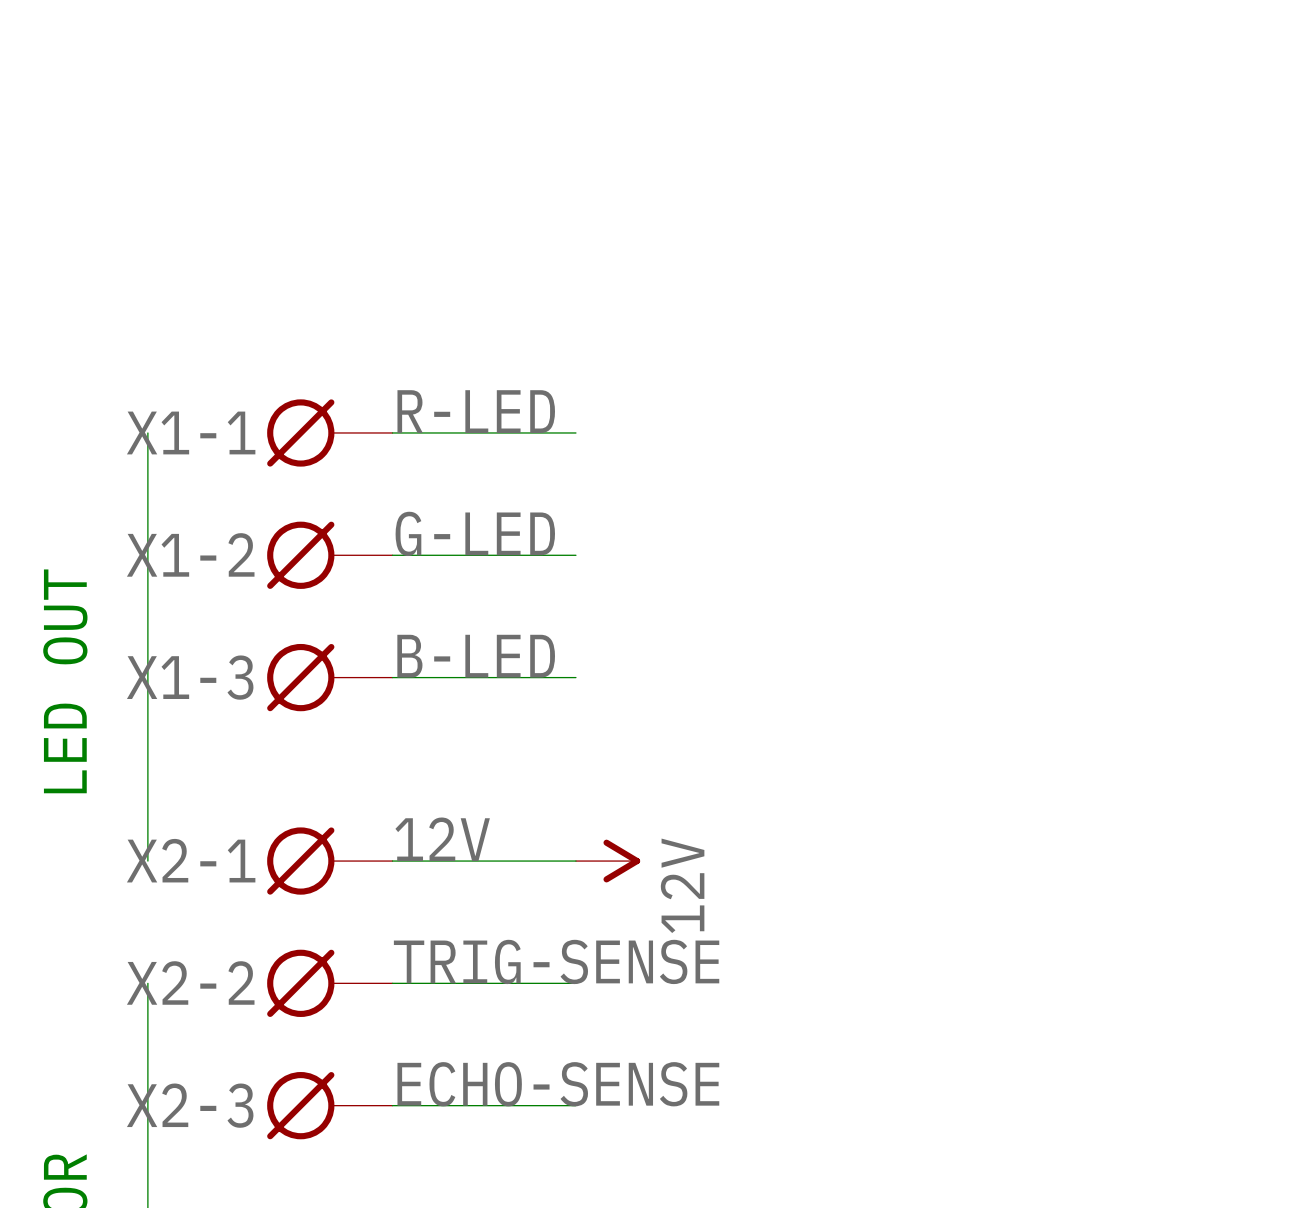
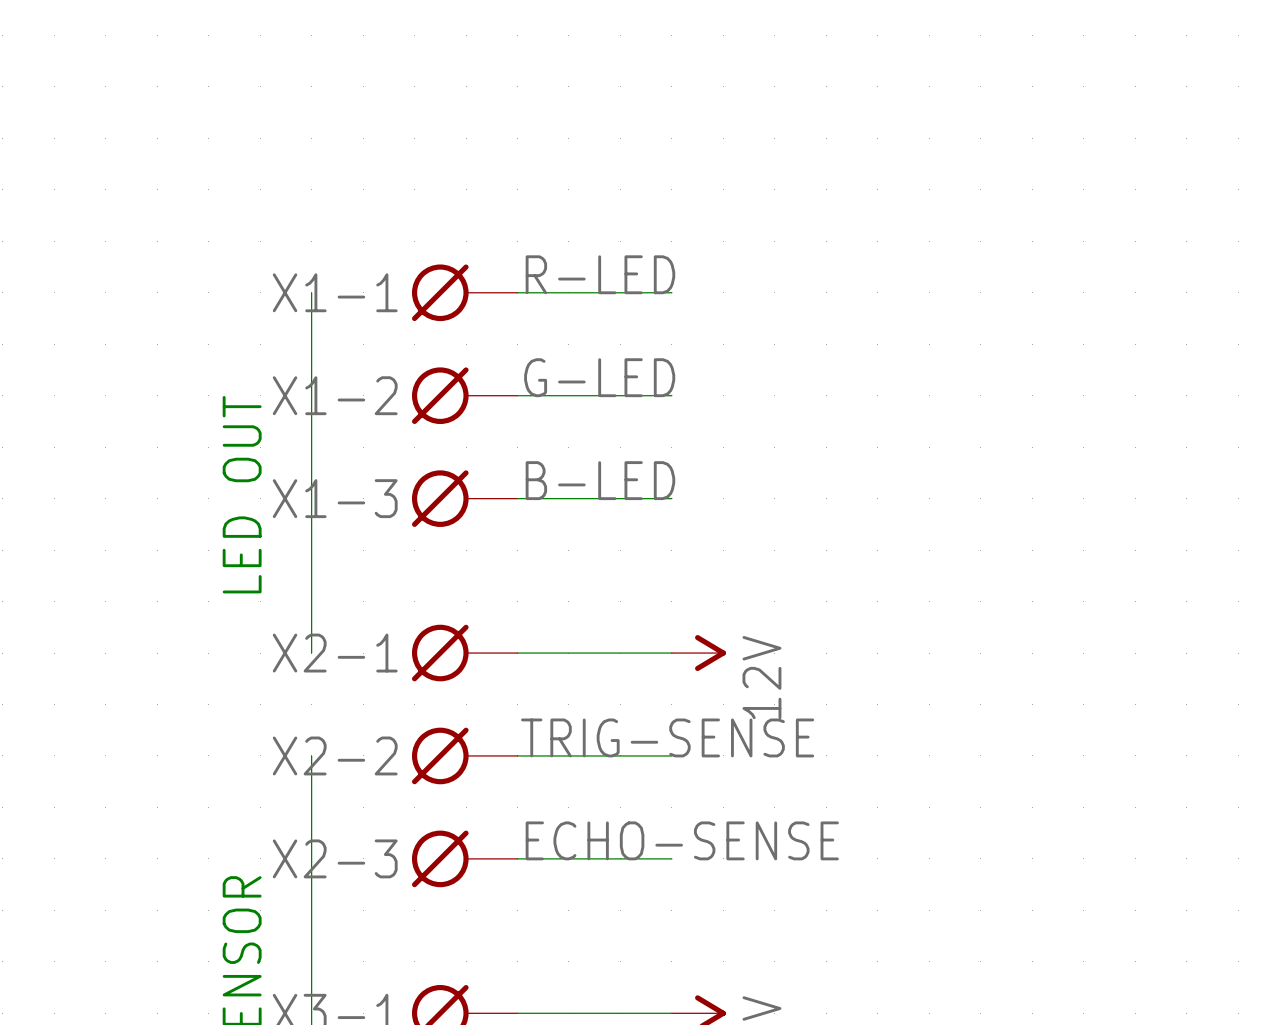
label: 12V (442, 839) -> none

